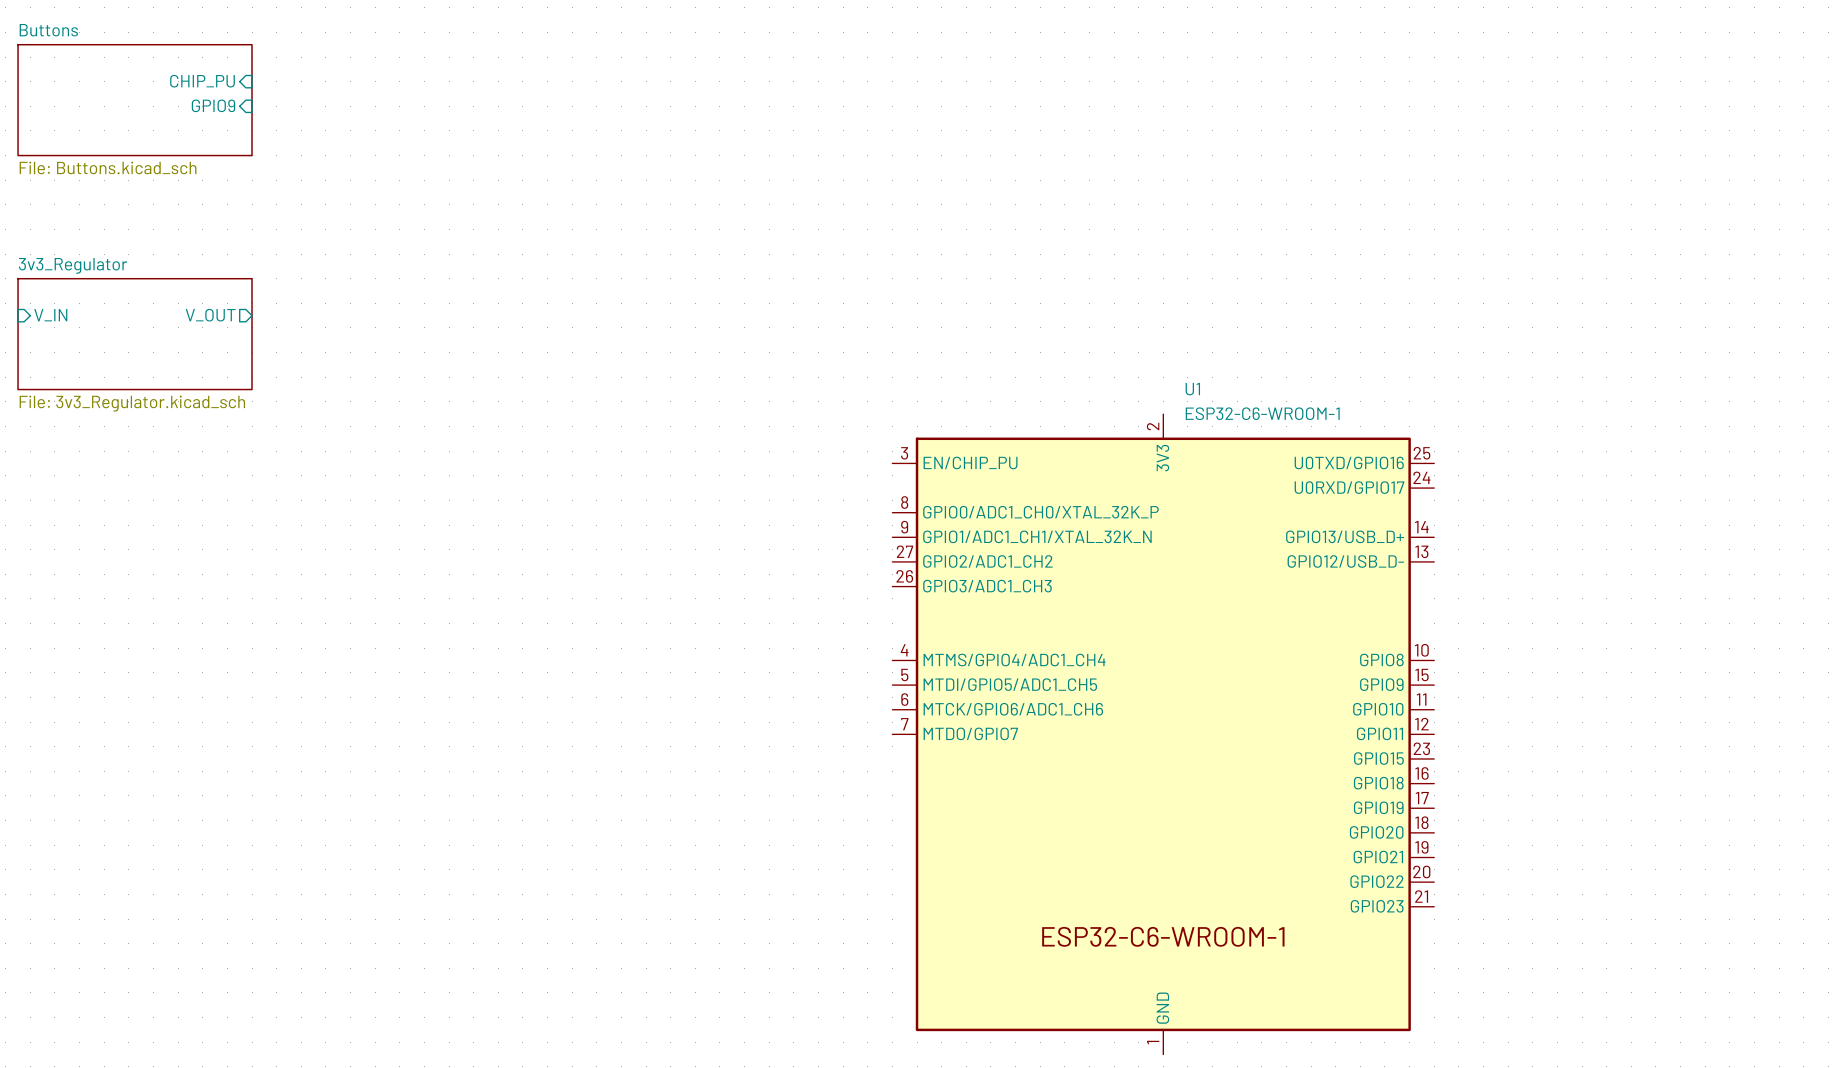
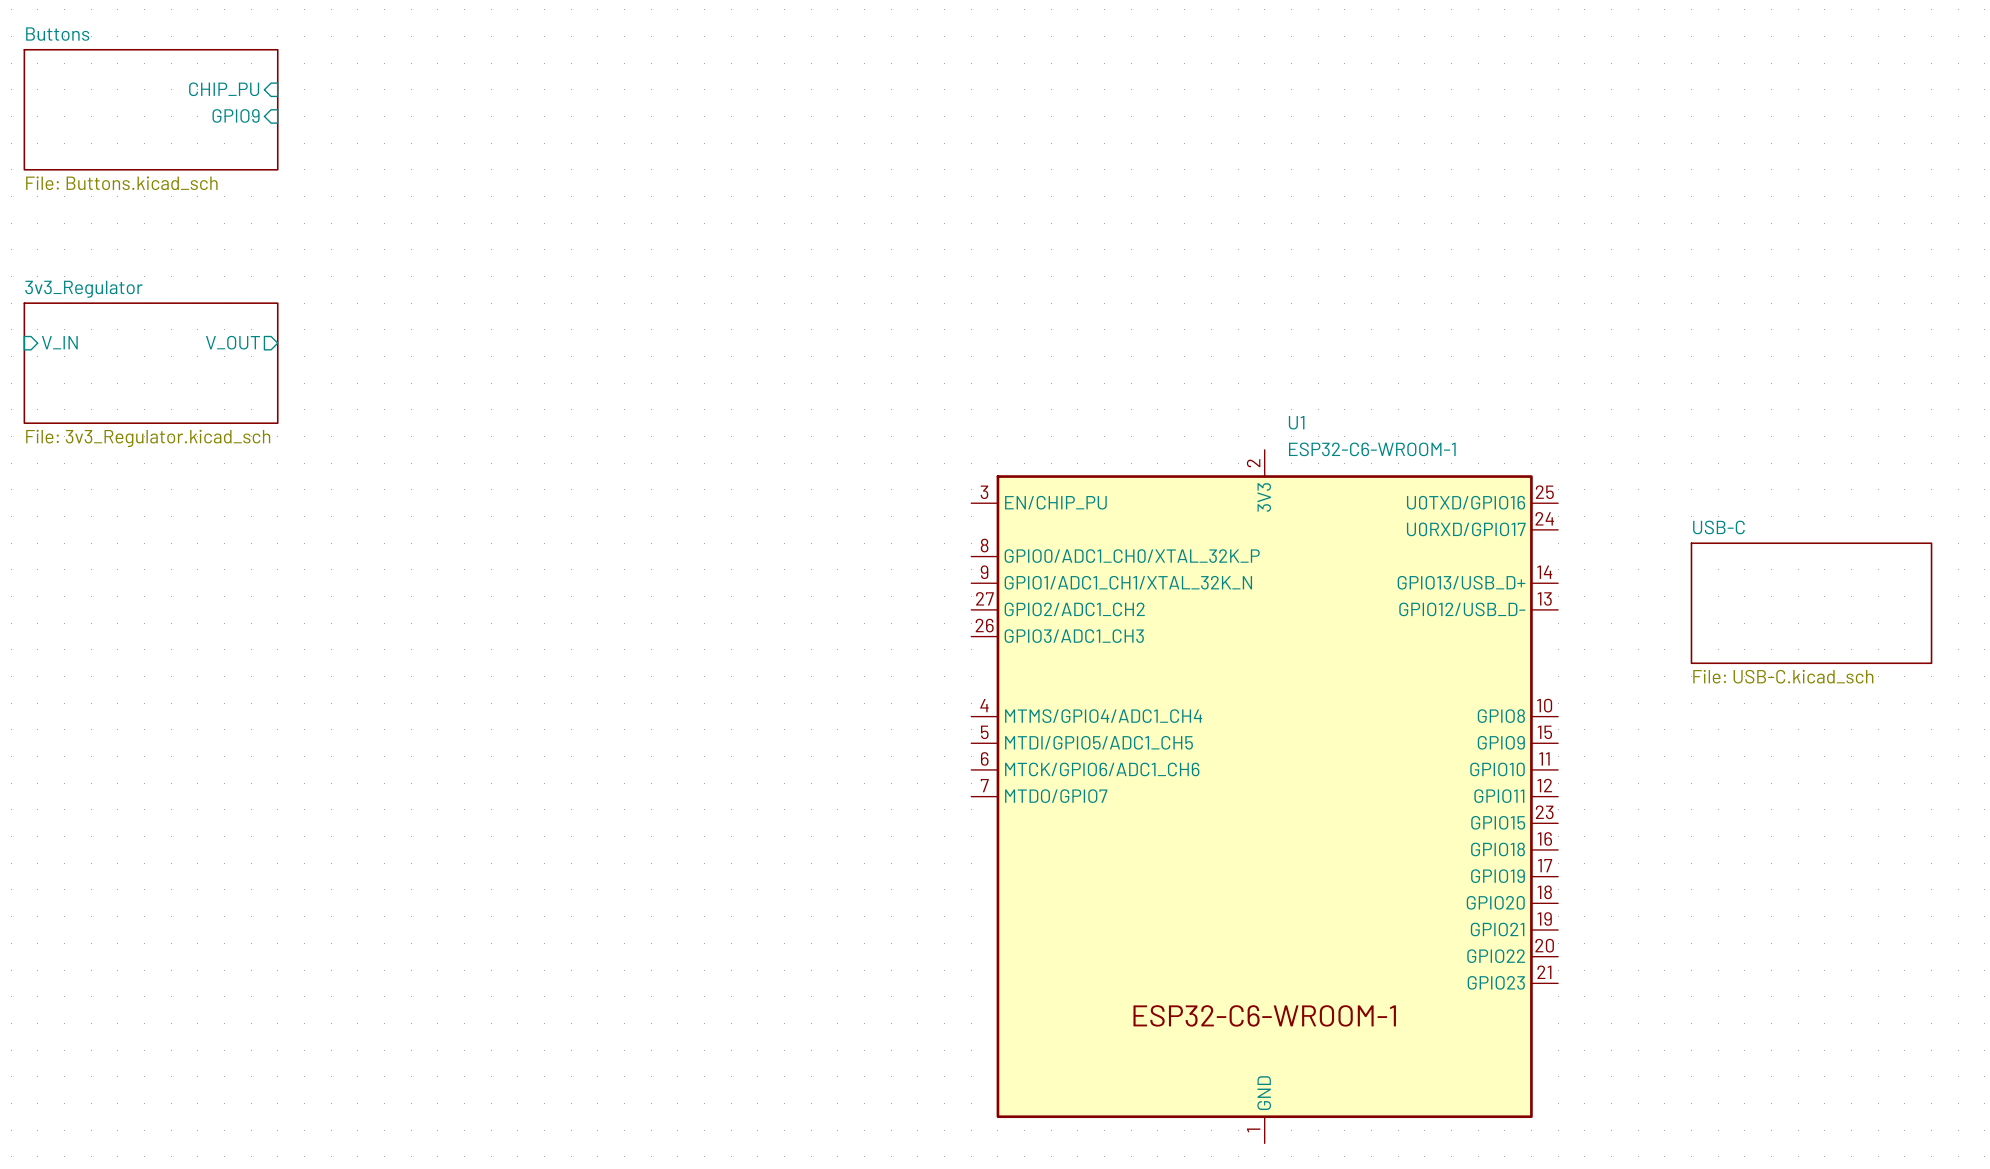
sheet USB-C: none -> File: USB-C.kicad_sch (1811, 603)

